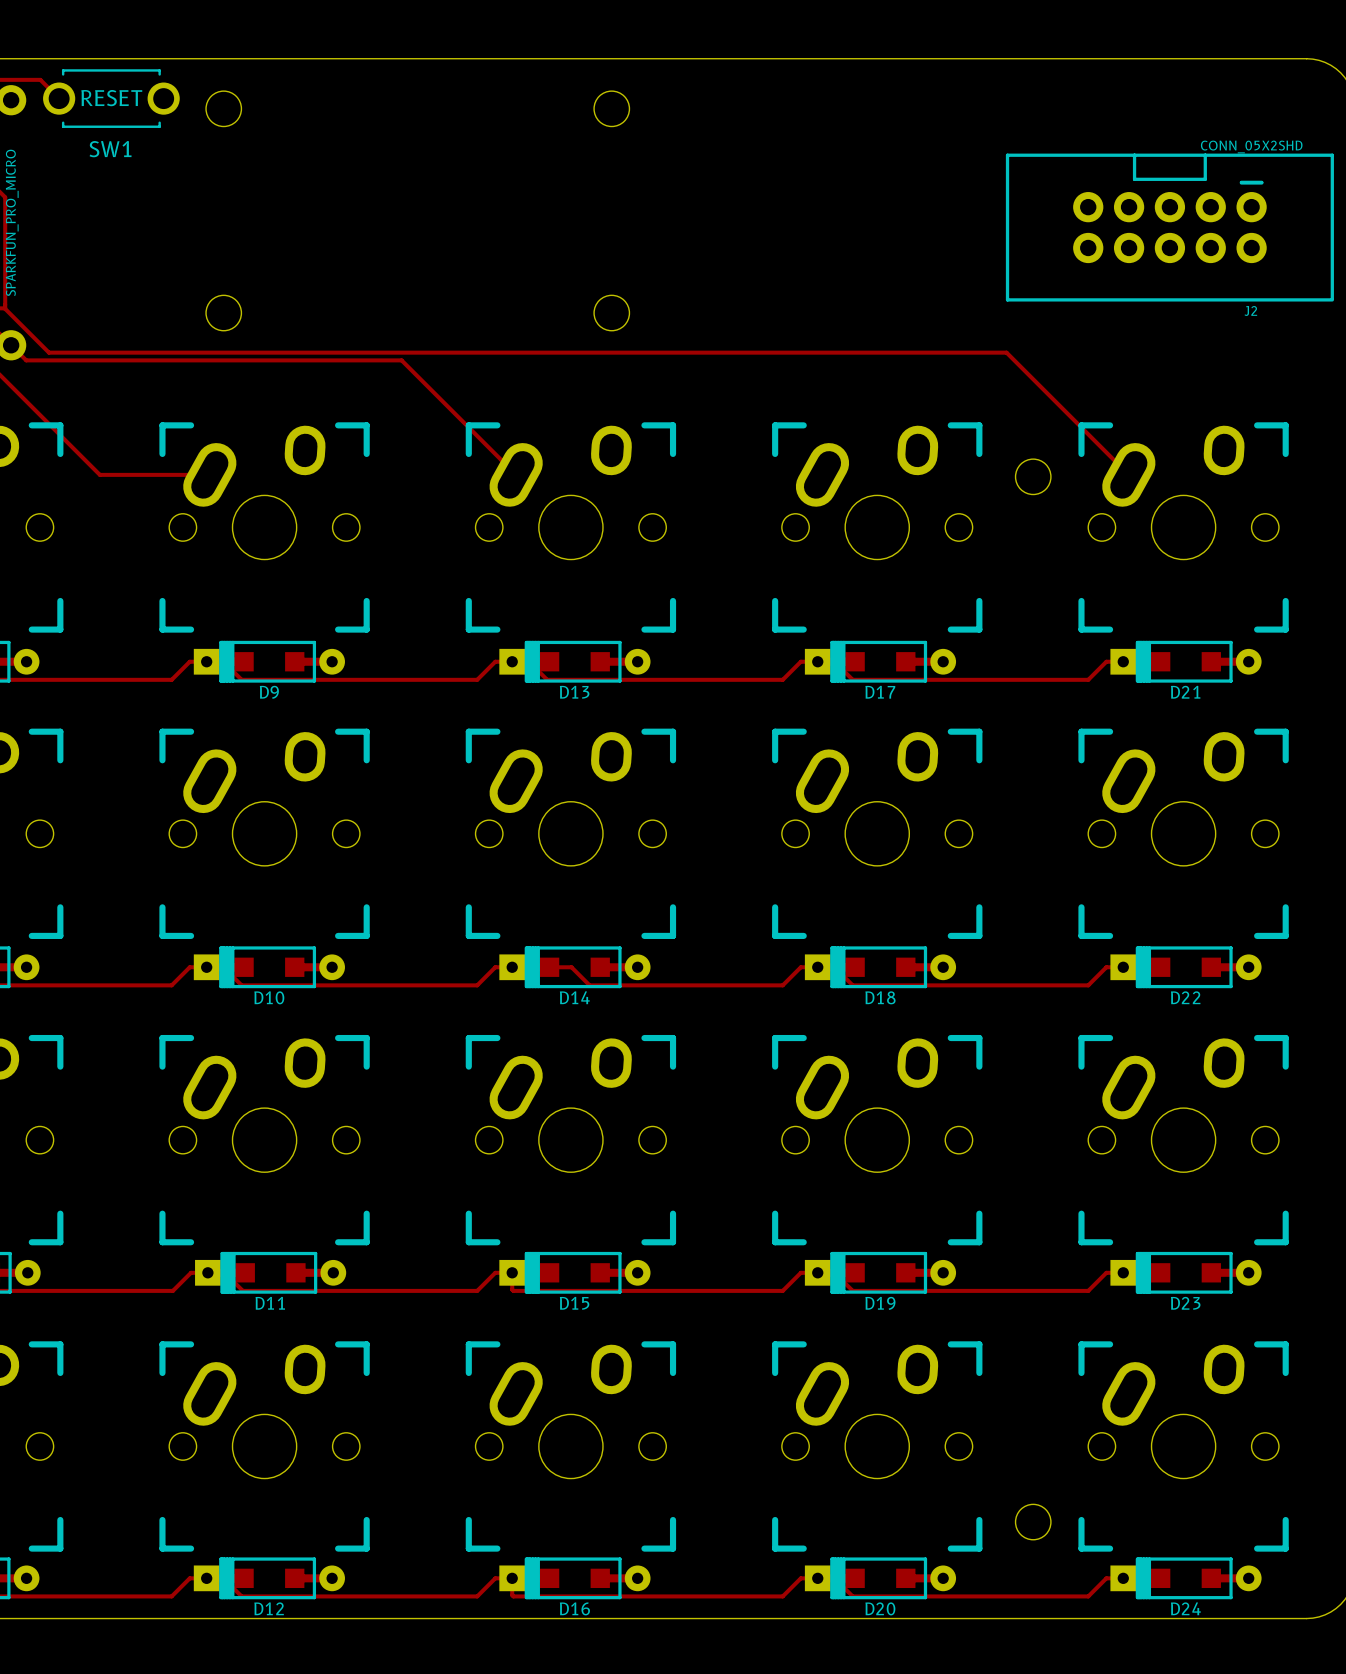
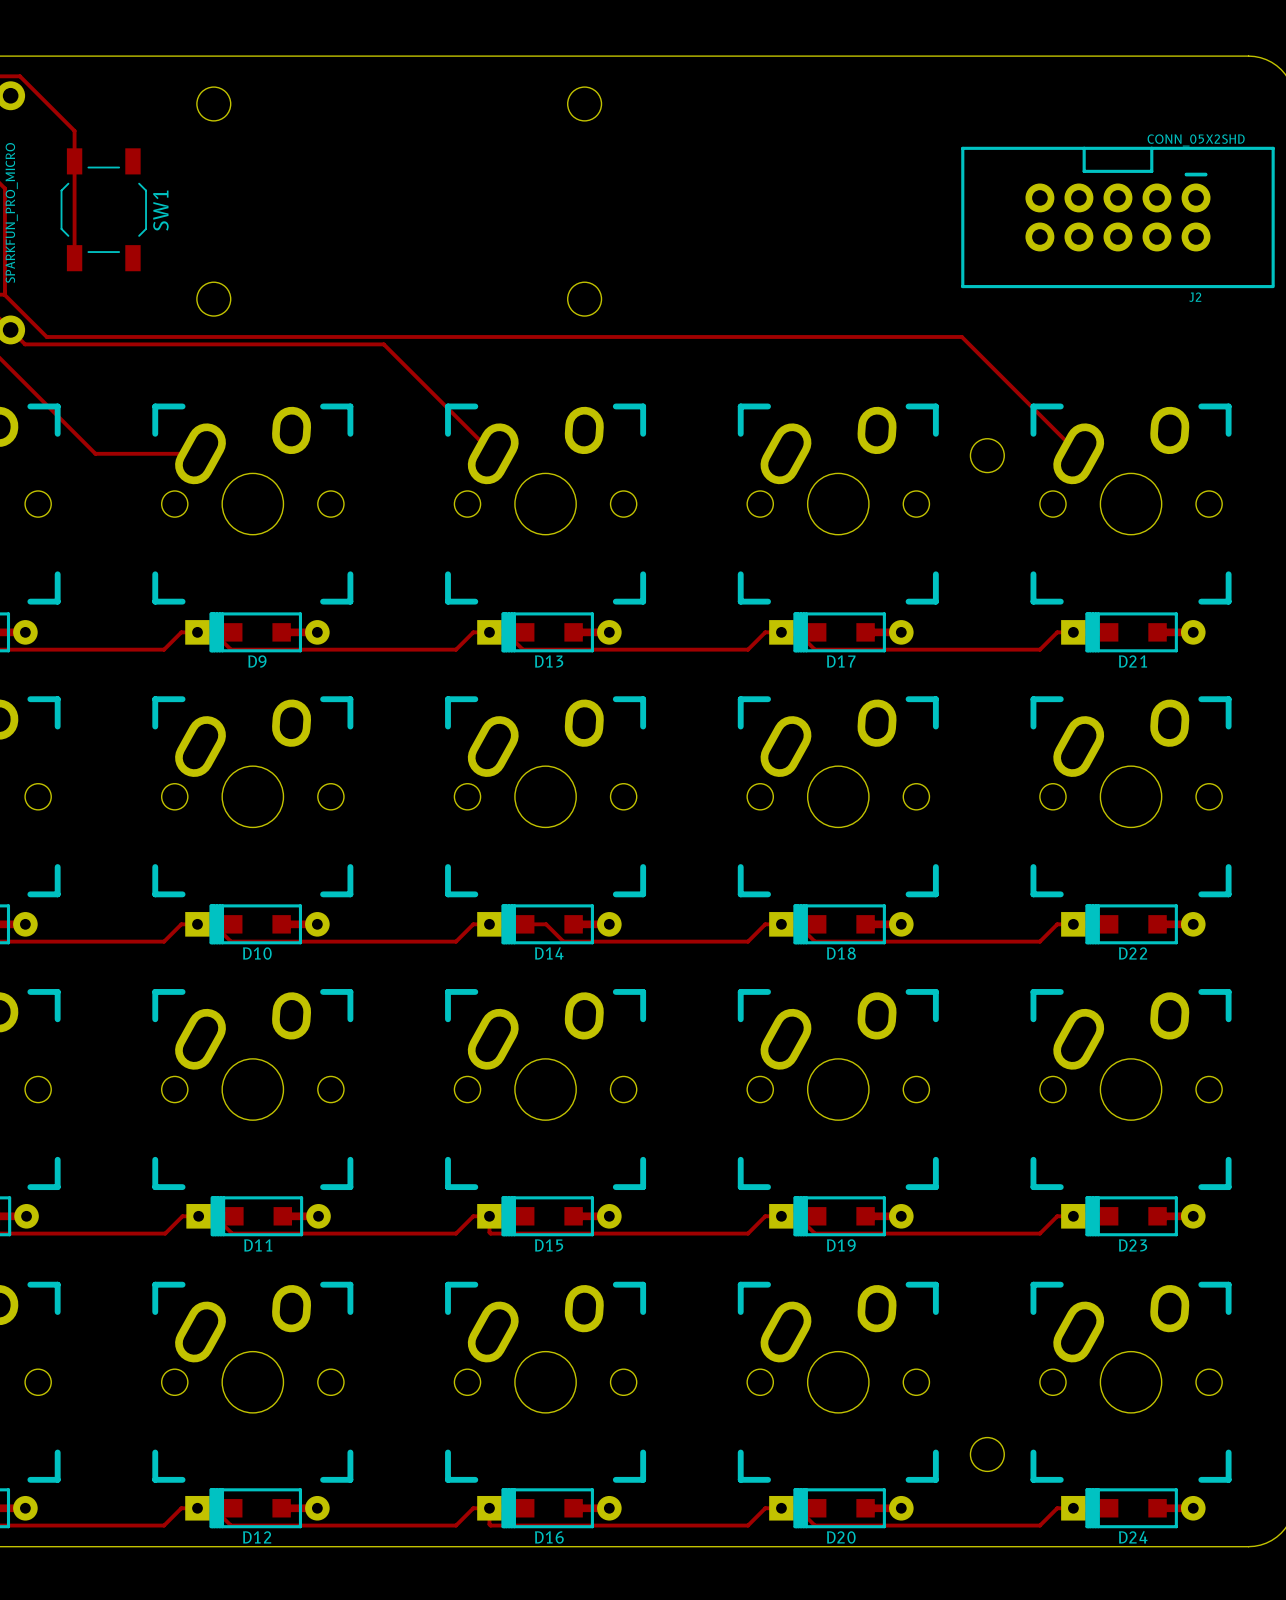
SW1 footprint: [43, 69, 180, 128] -> [60, 148, 147, 272]
track: (20, 79) (40, 79) (59, 98) -> (19, 76) (74, 130) (74, 258)
SW1 name position: SW1 (110, 149) -> SW1 (160, 210)

